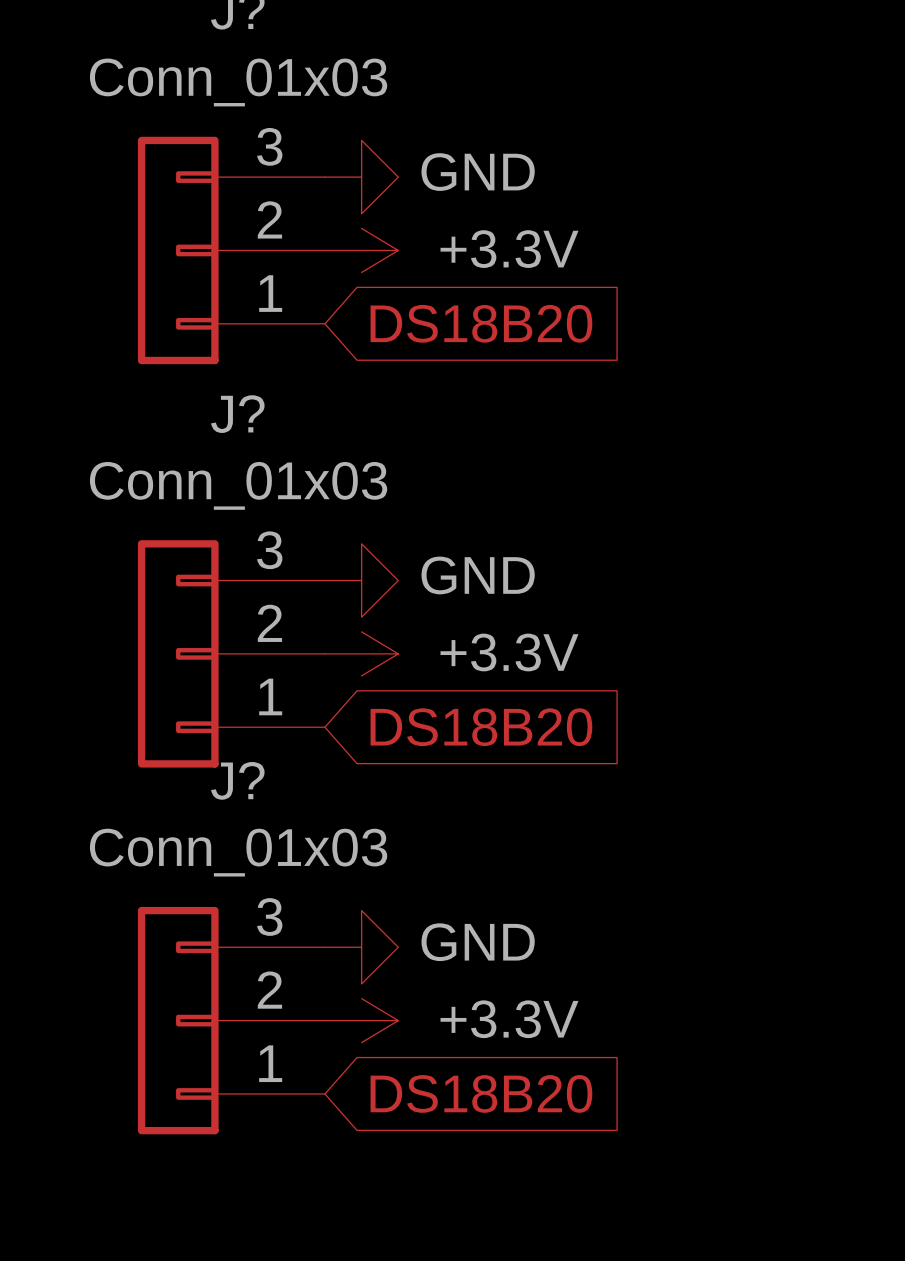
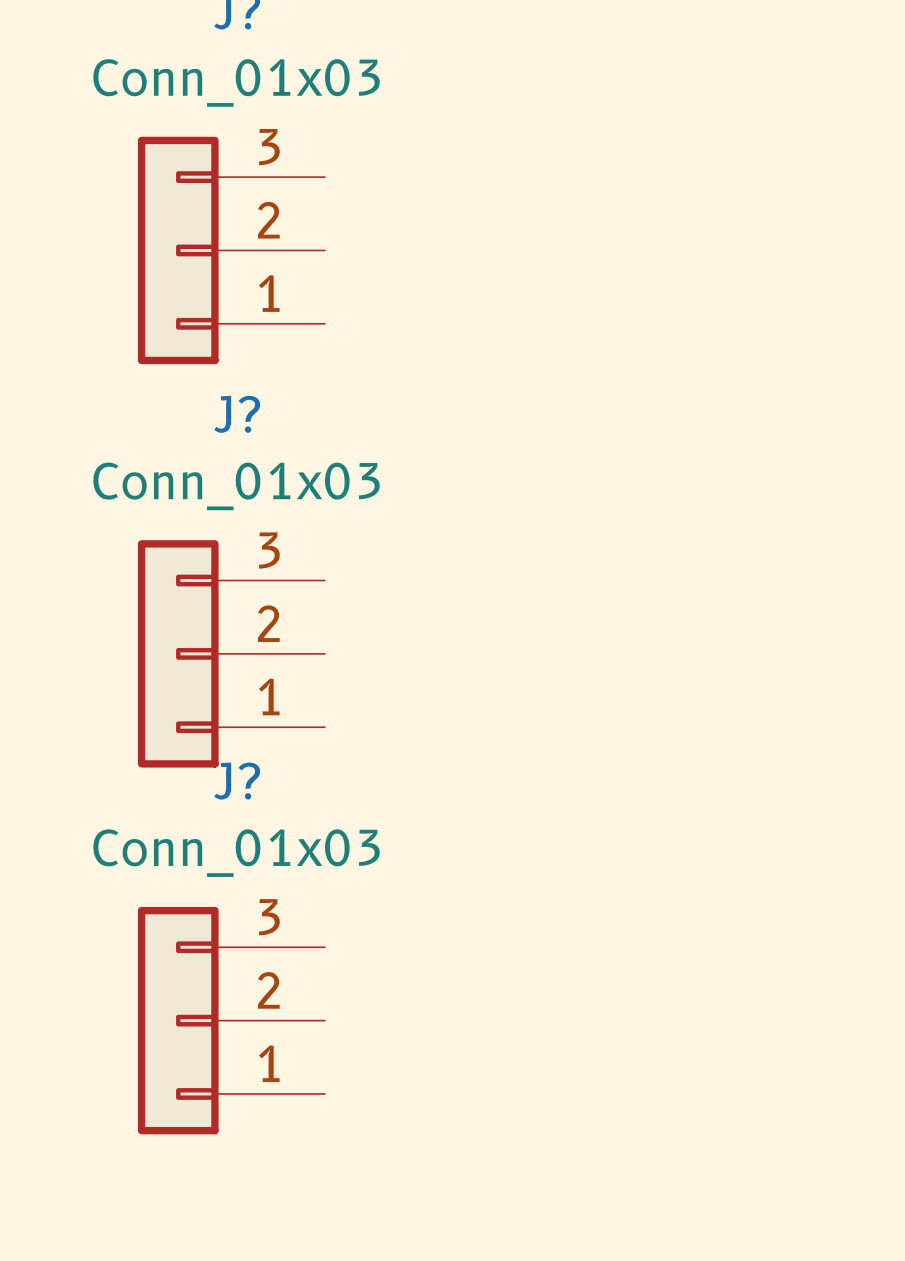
power symbol: GND (361, 177) -> none
power symbol: +3.3V (361, 250) -> none
global label: DS18B20 (481, 323) -> none
power symbol: GND (361, 580) -> none
power symbol: +3.3V (361, 653) -> none
global label: DS18B20 (481, 727) -> none
power symbol: GND (361, 947) -> none
power symbol: +3.3V (361, 1020) -> none
global label: DS18B20 (481, 1093) -> none

